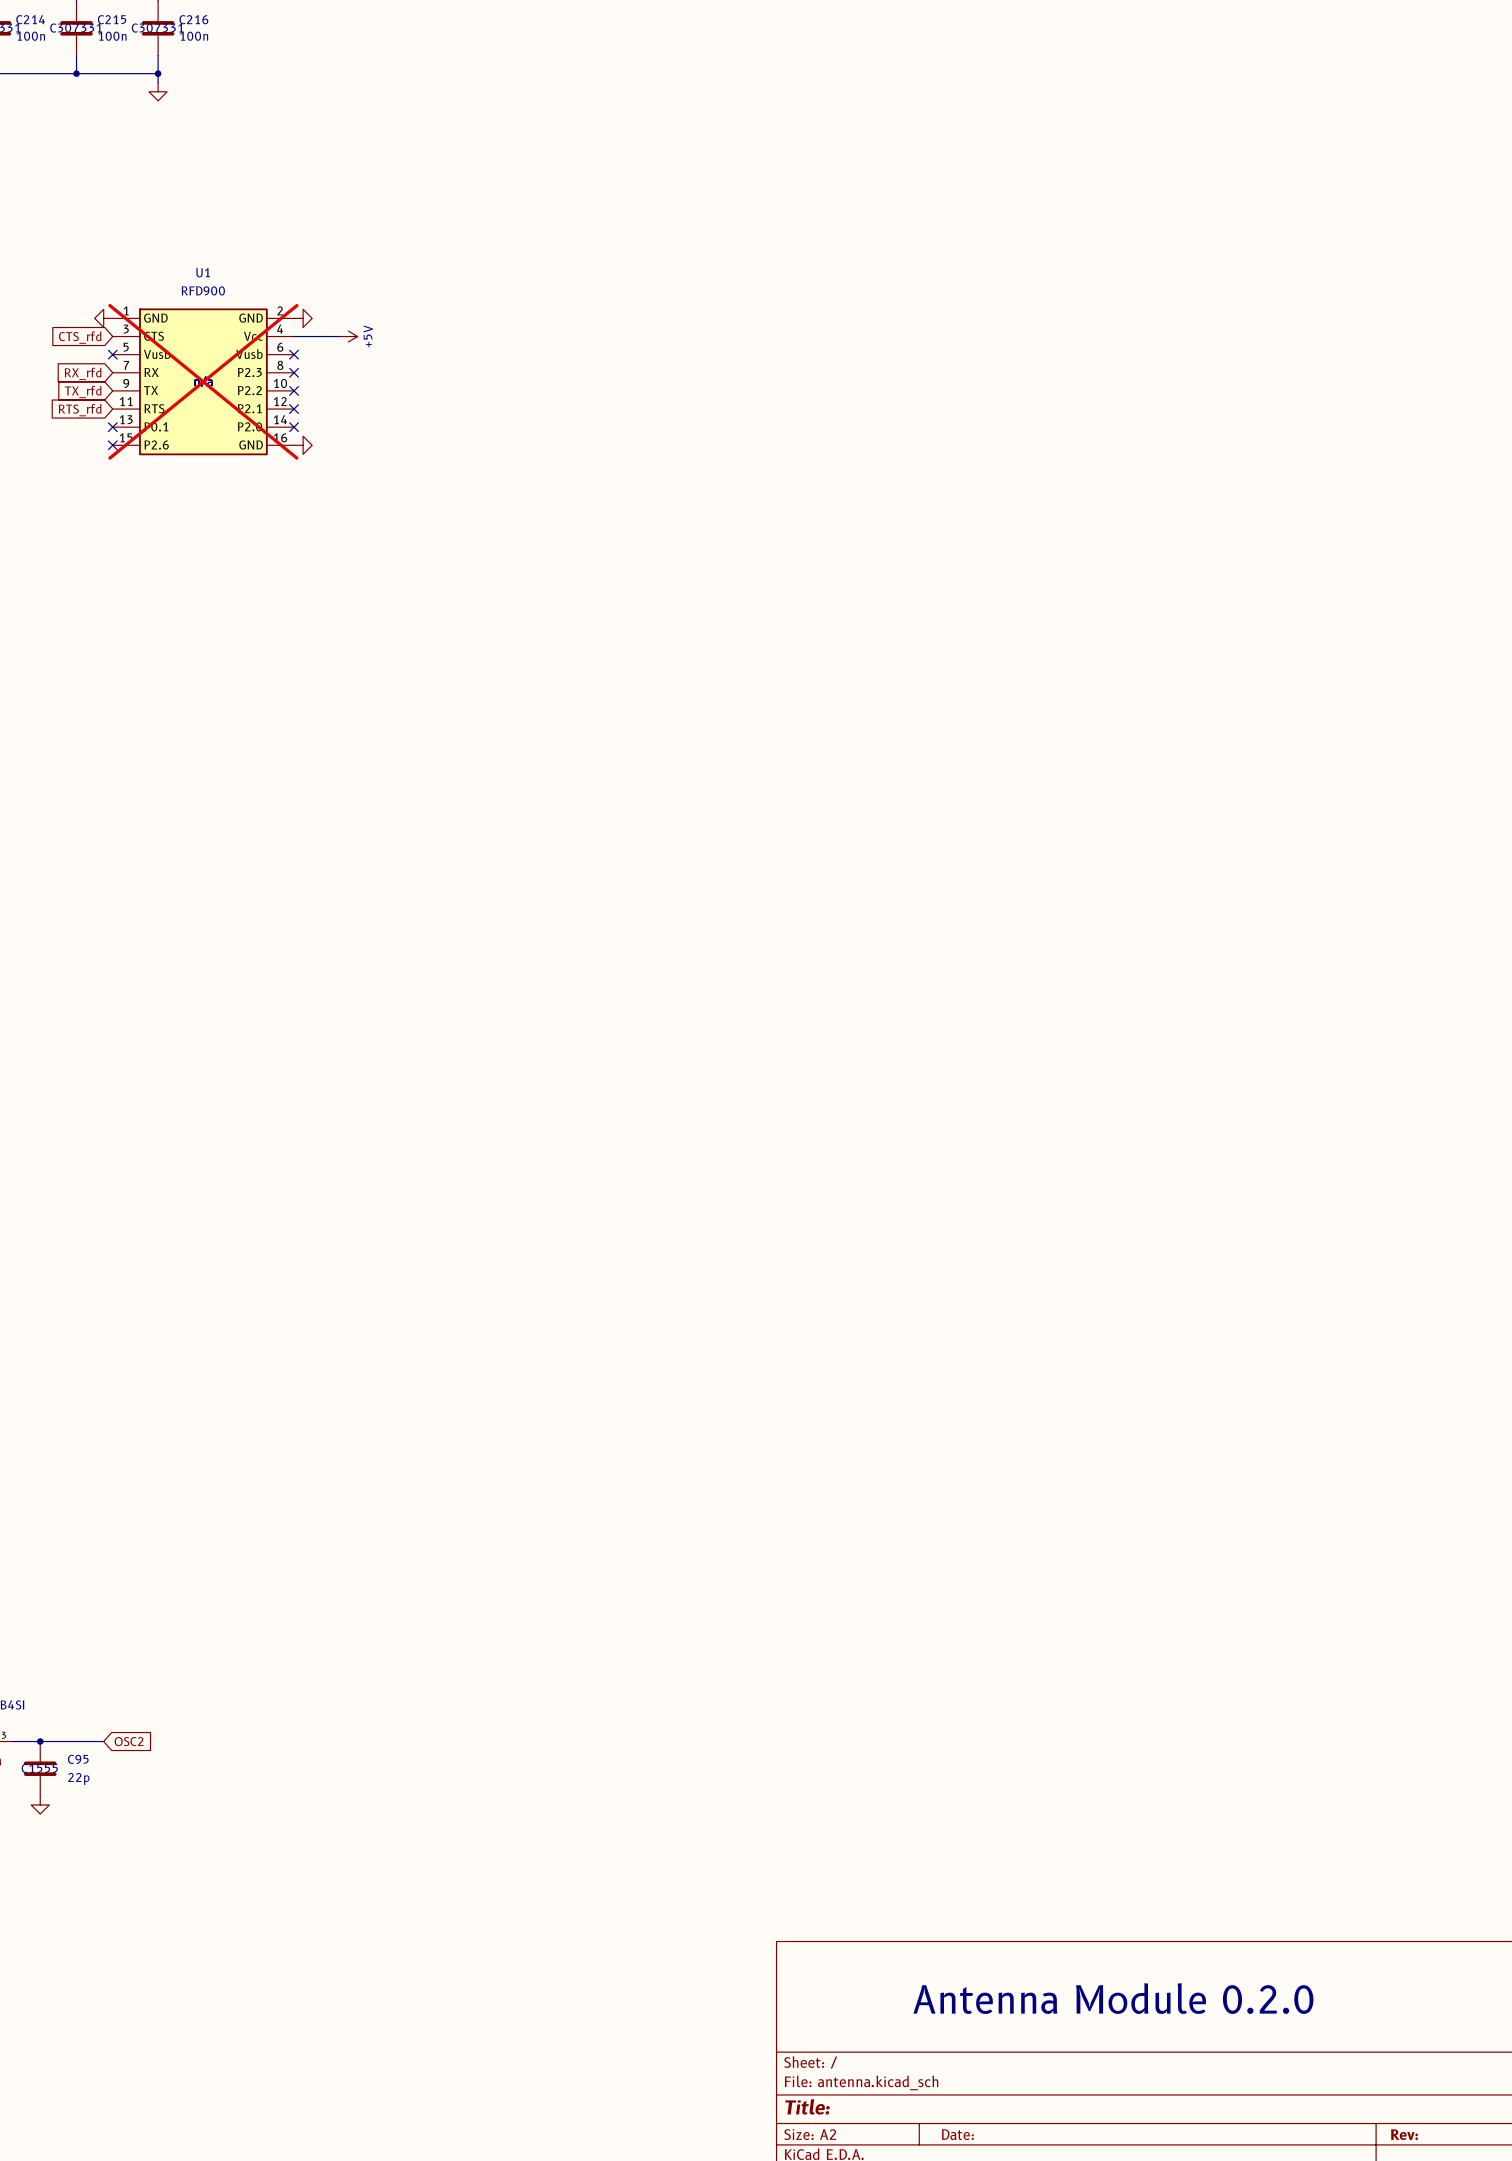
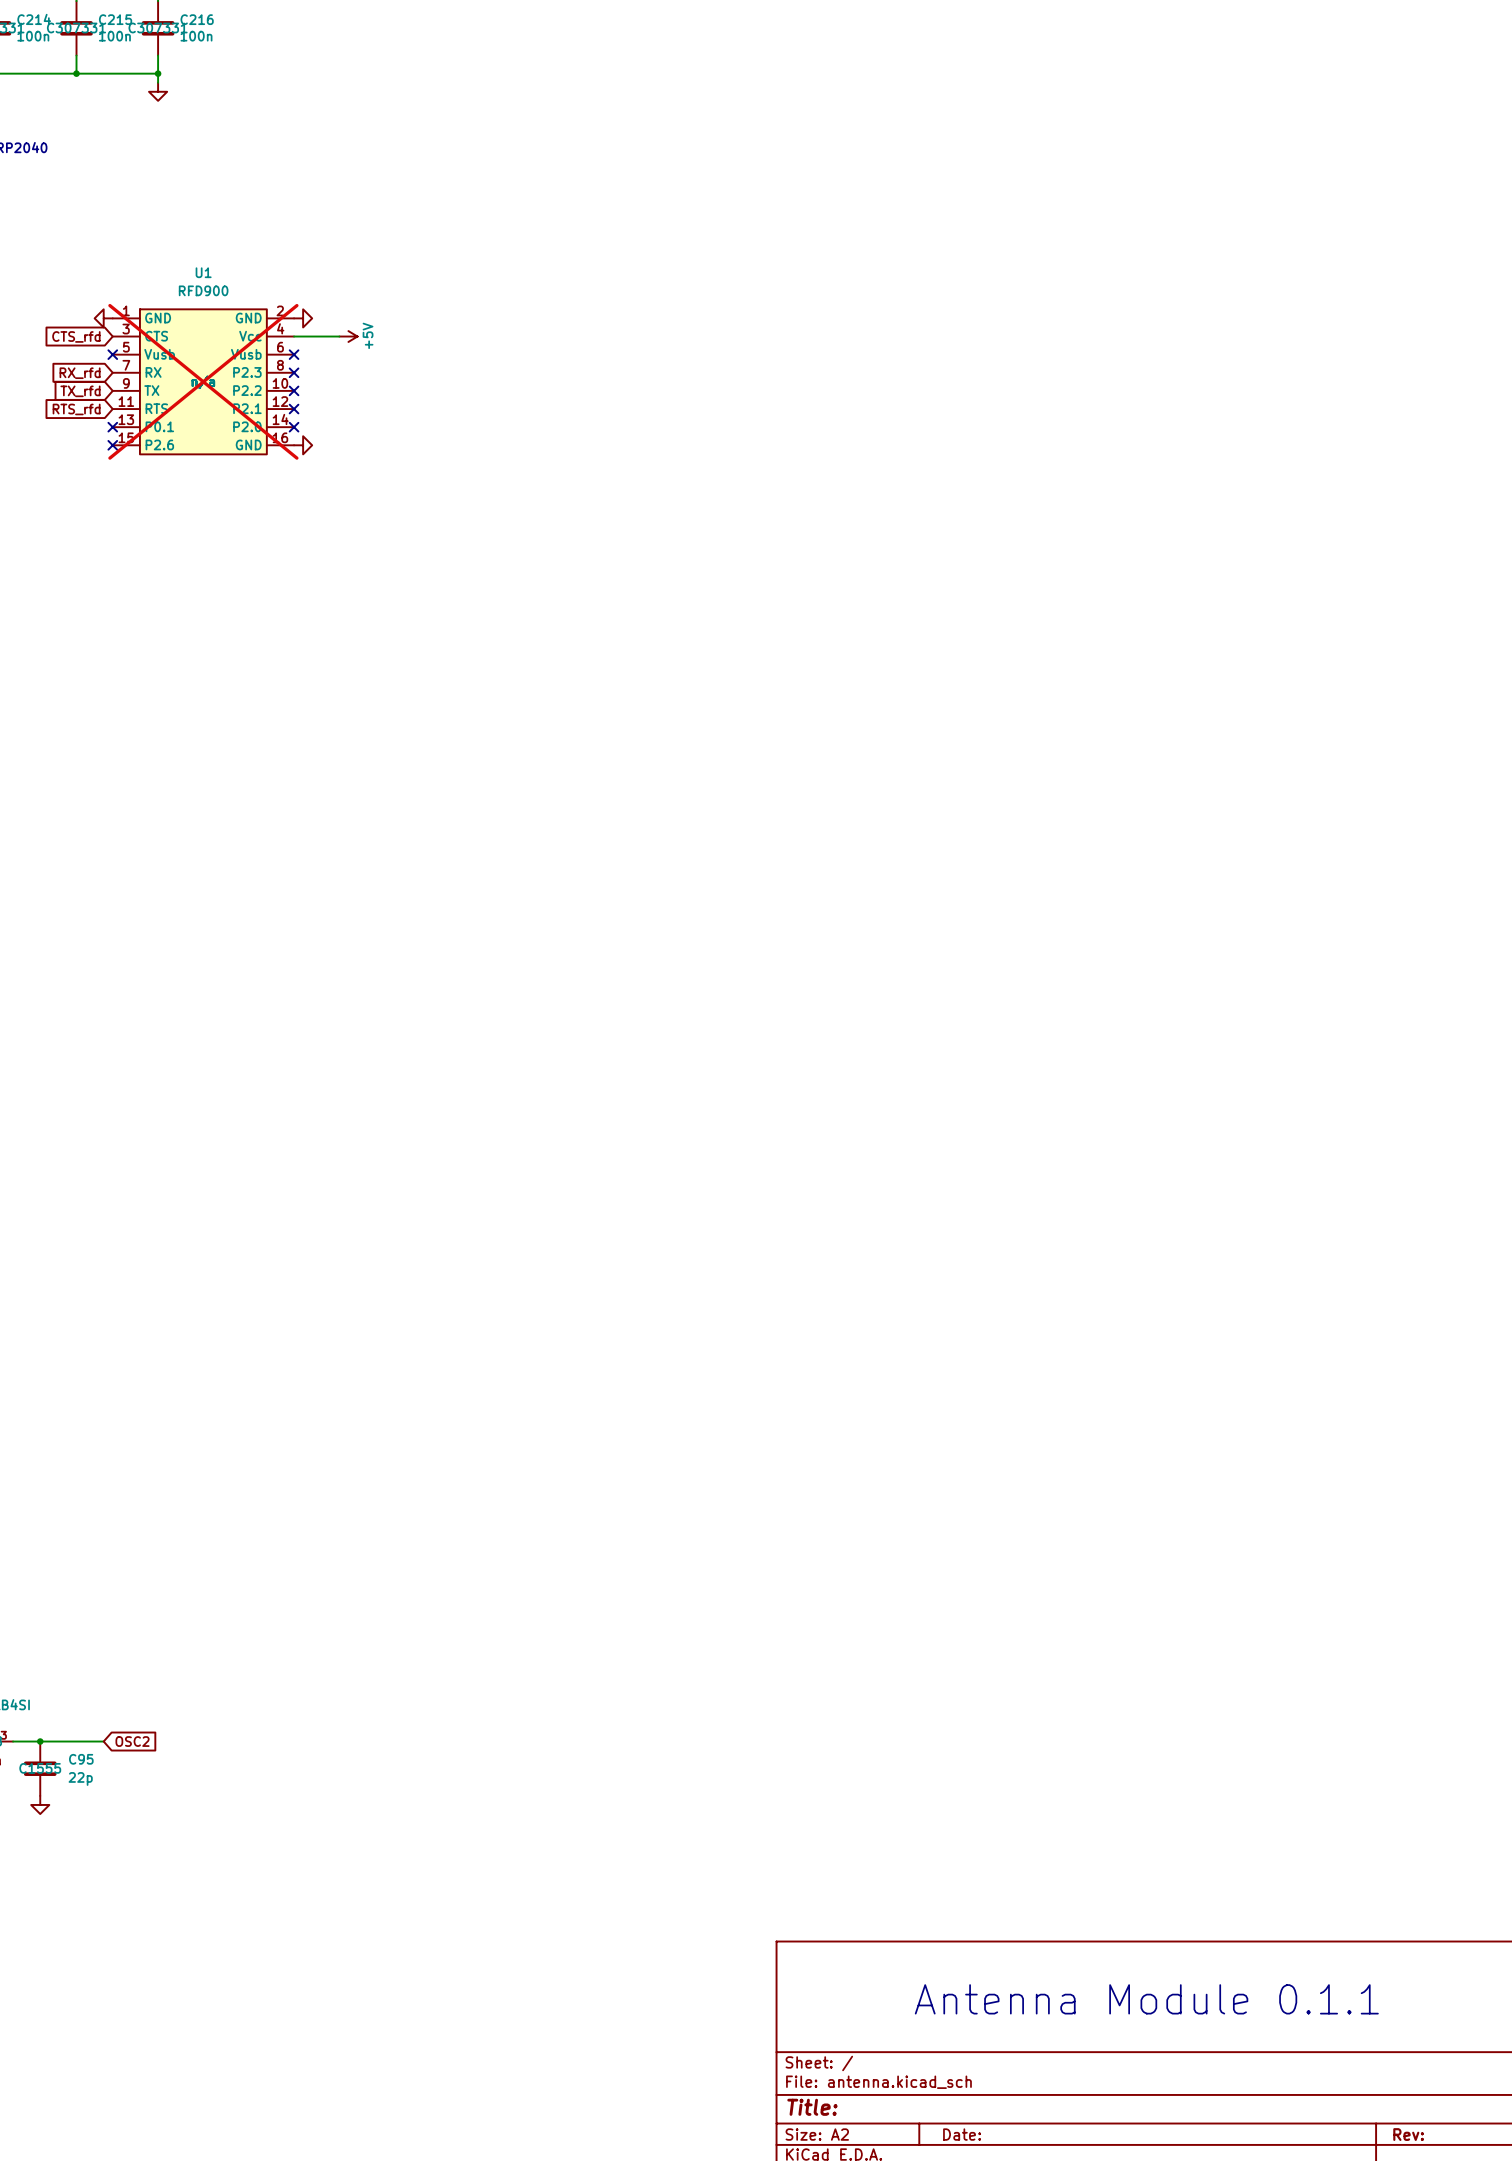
text: Antenna Module 0.2.0 (1113, 1998) -> Antenna Module 0.1.1 (1146, 1999)

